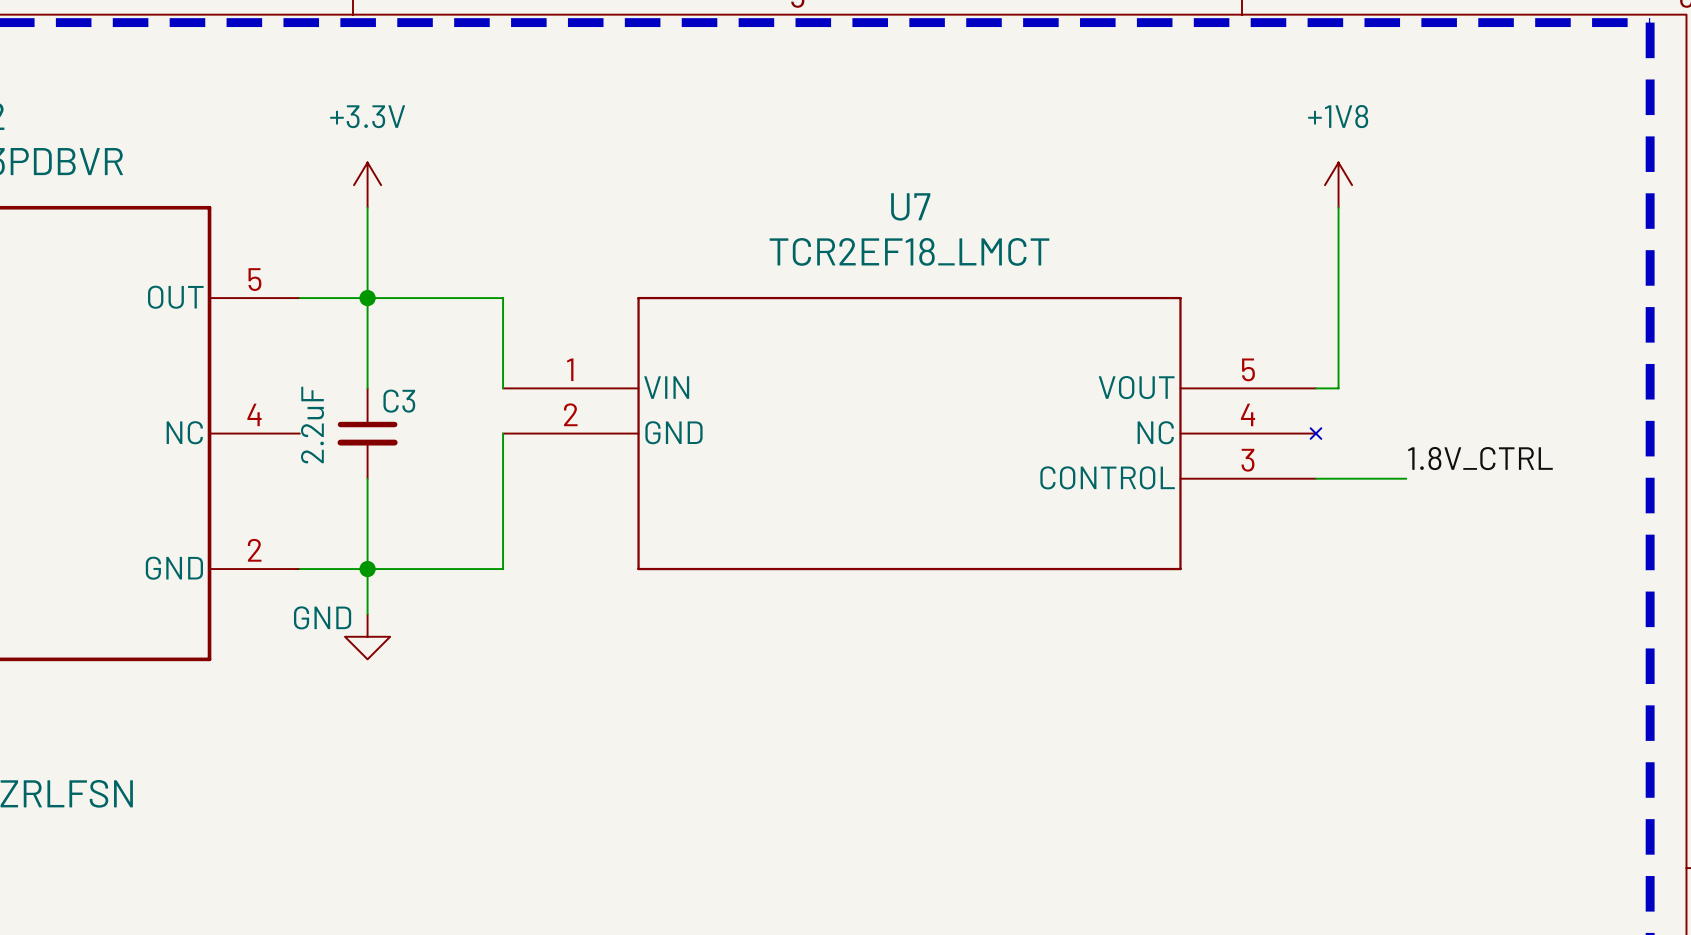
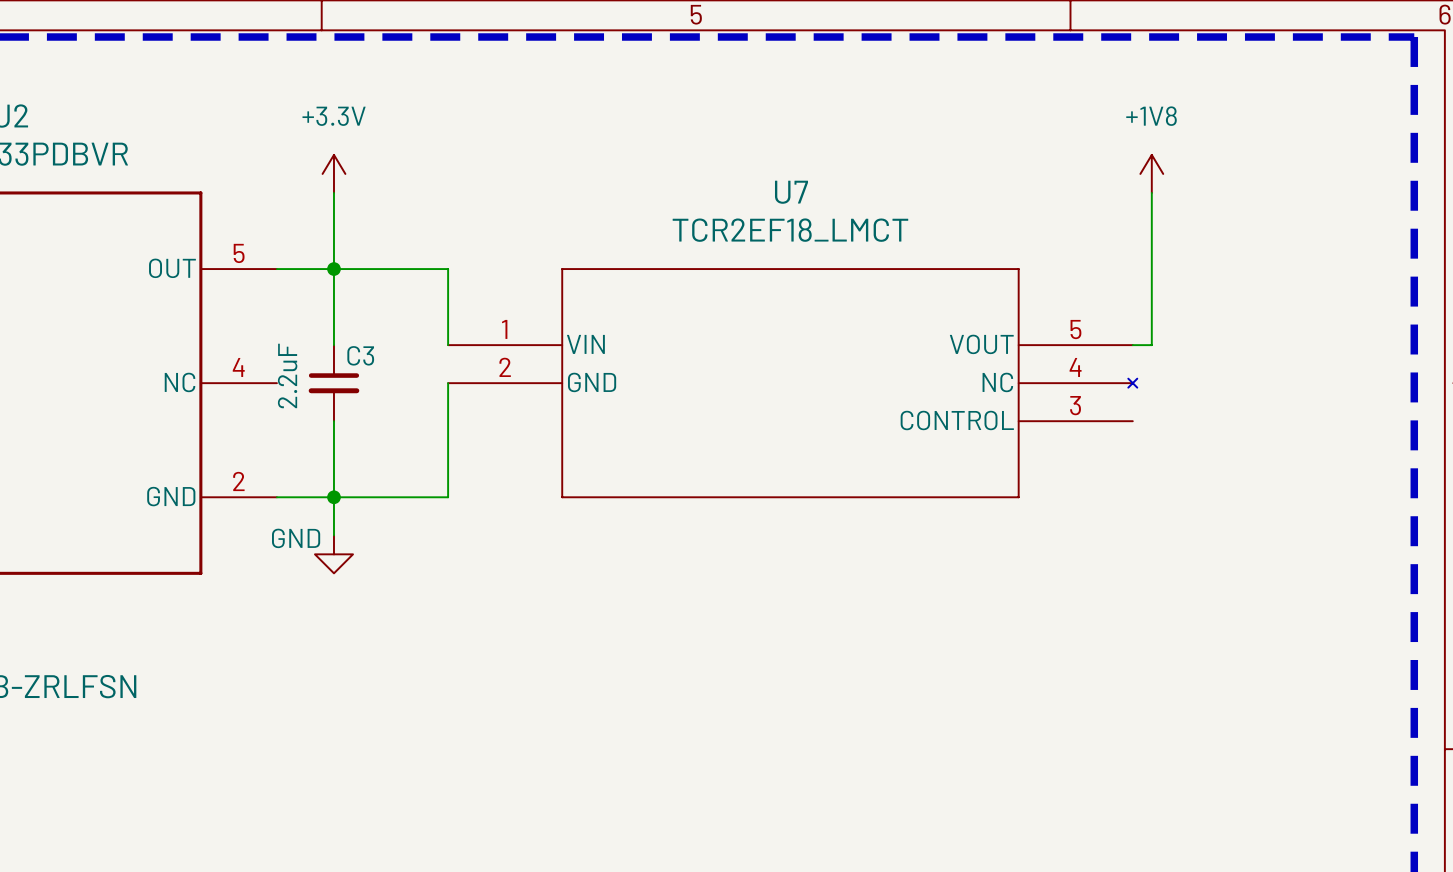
label: 1.8V_CTRL (1480, 458) -> none
wire: (1315, 478) (1406, 478) -> none

